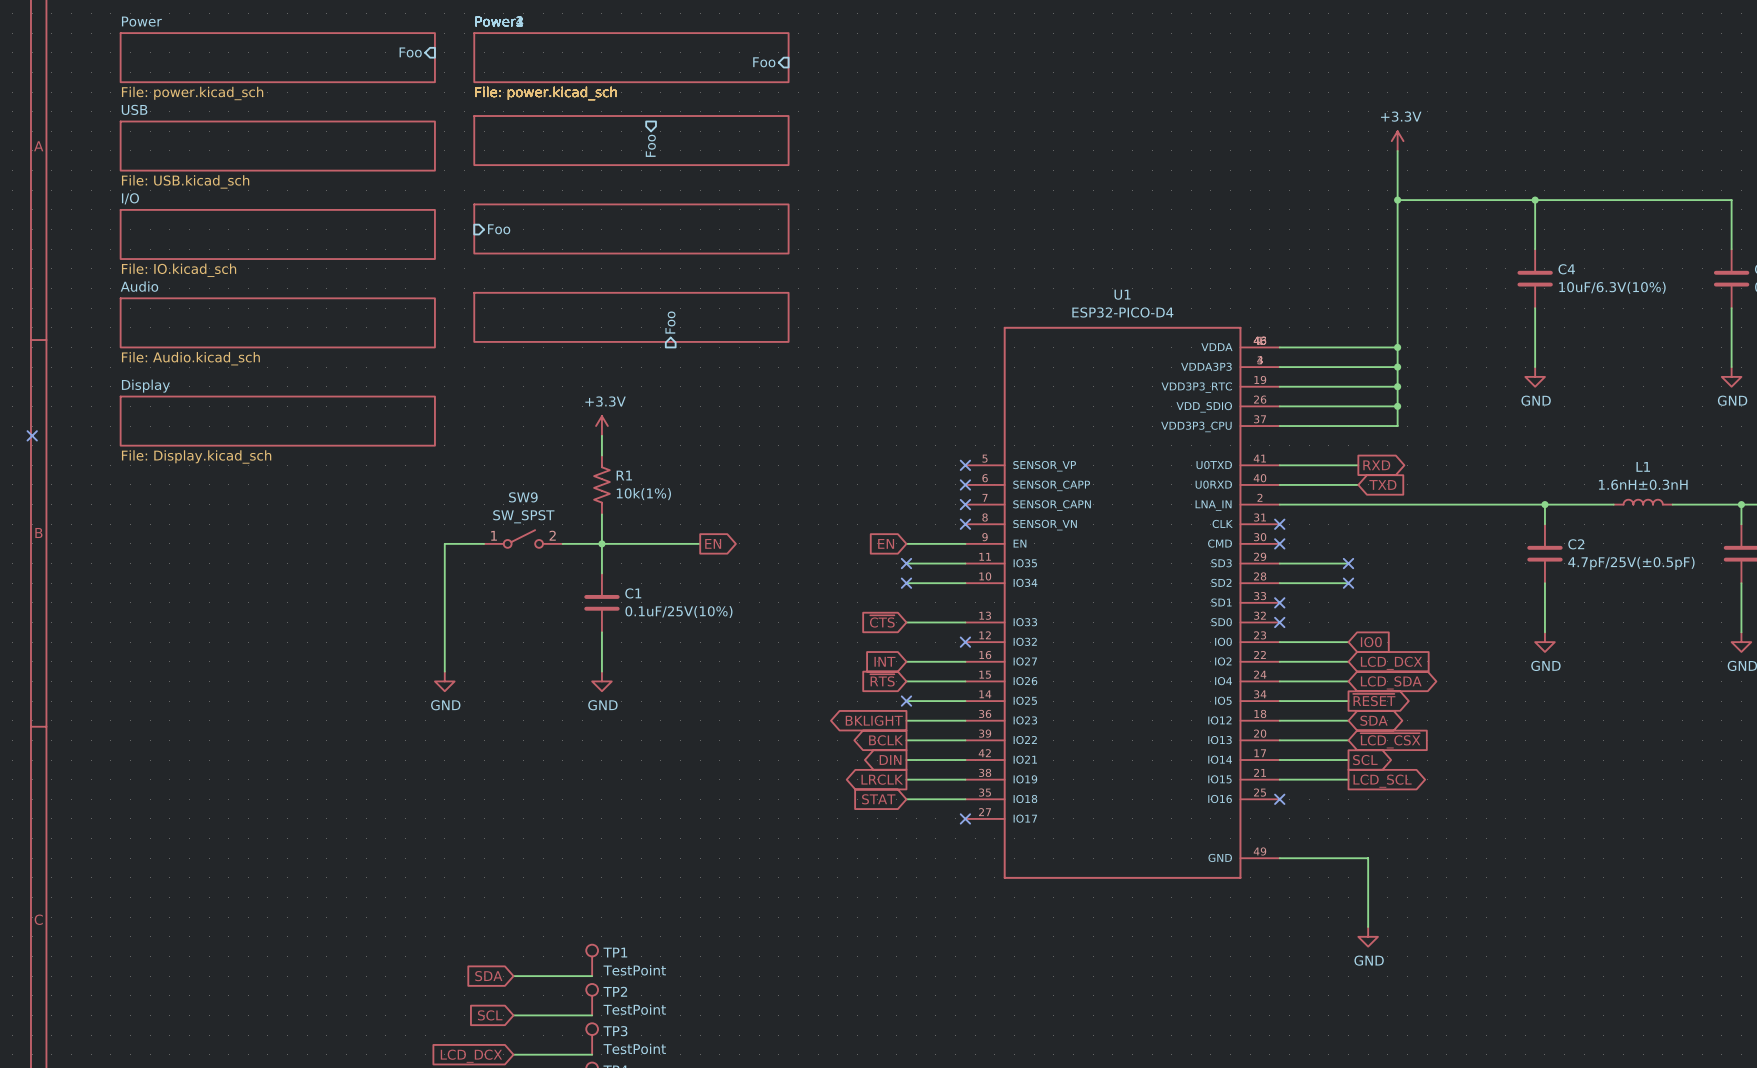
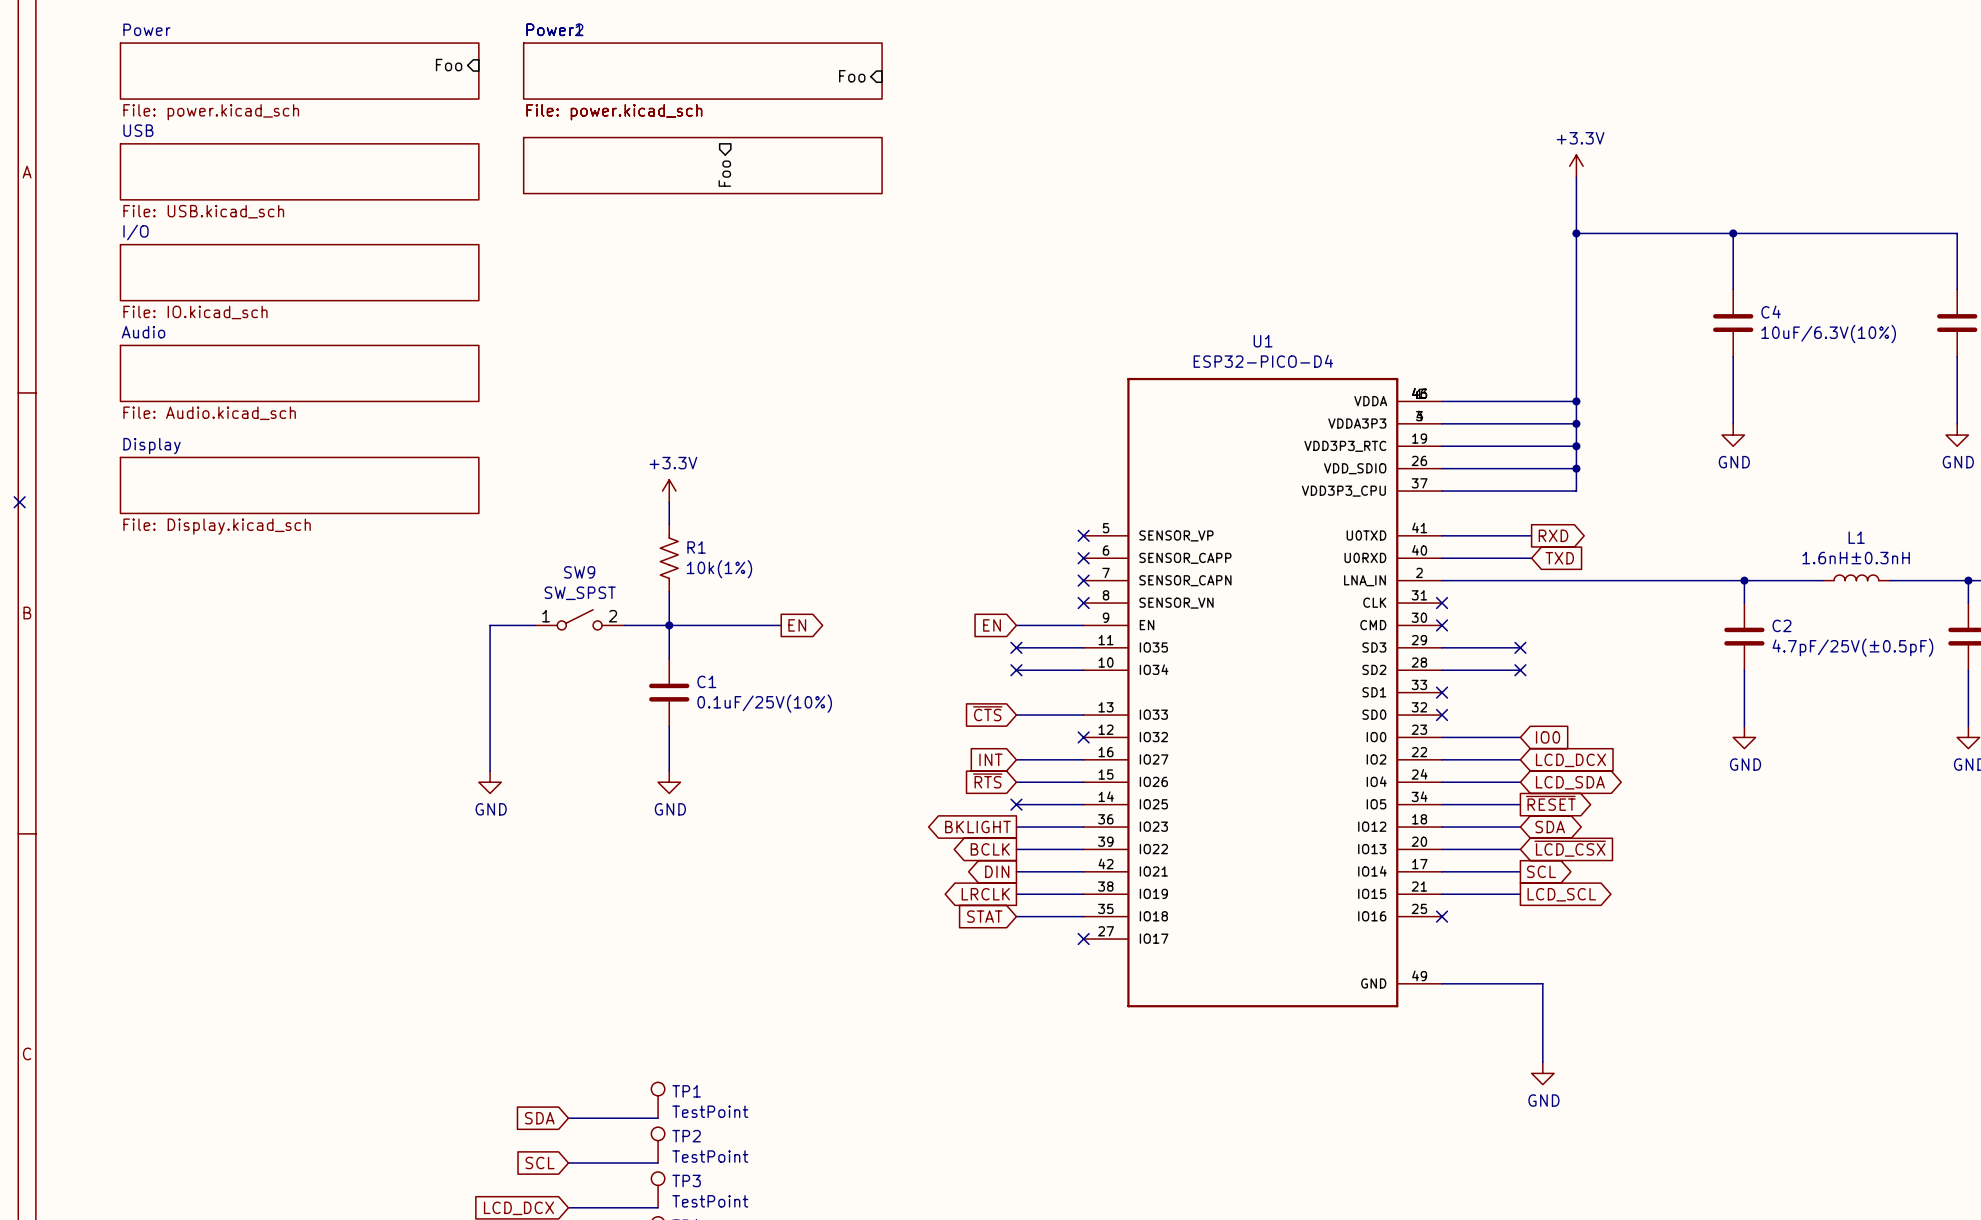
sheet: File: power.kicad_sch (631, 228) -> none
sheet pin: Foo (499, 229) -> none
sheet: File: power.kicad_sch (631, 317) -> none
sheet pin: Foo (670, 322) -> none

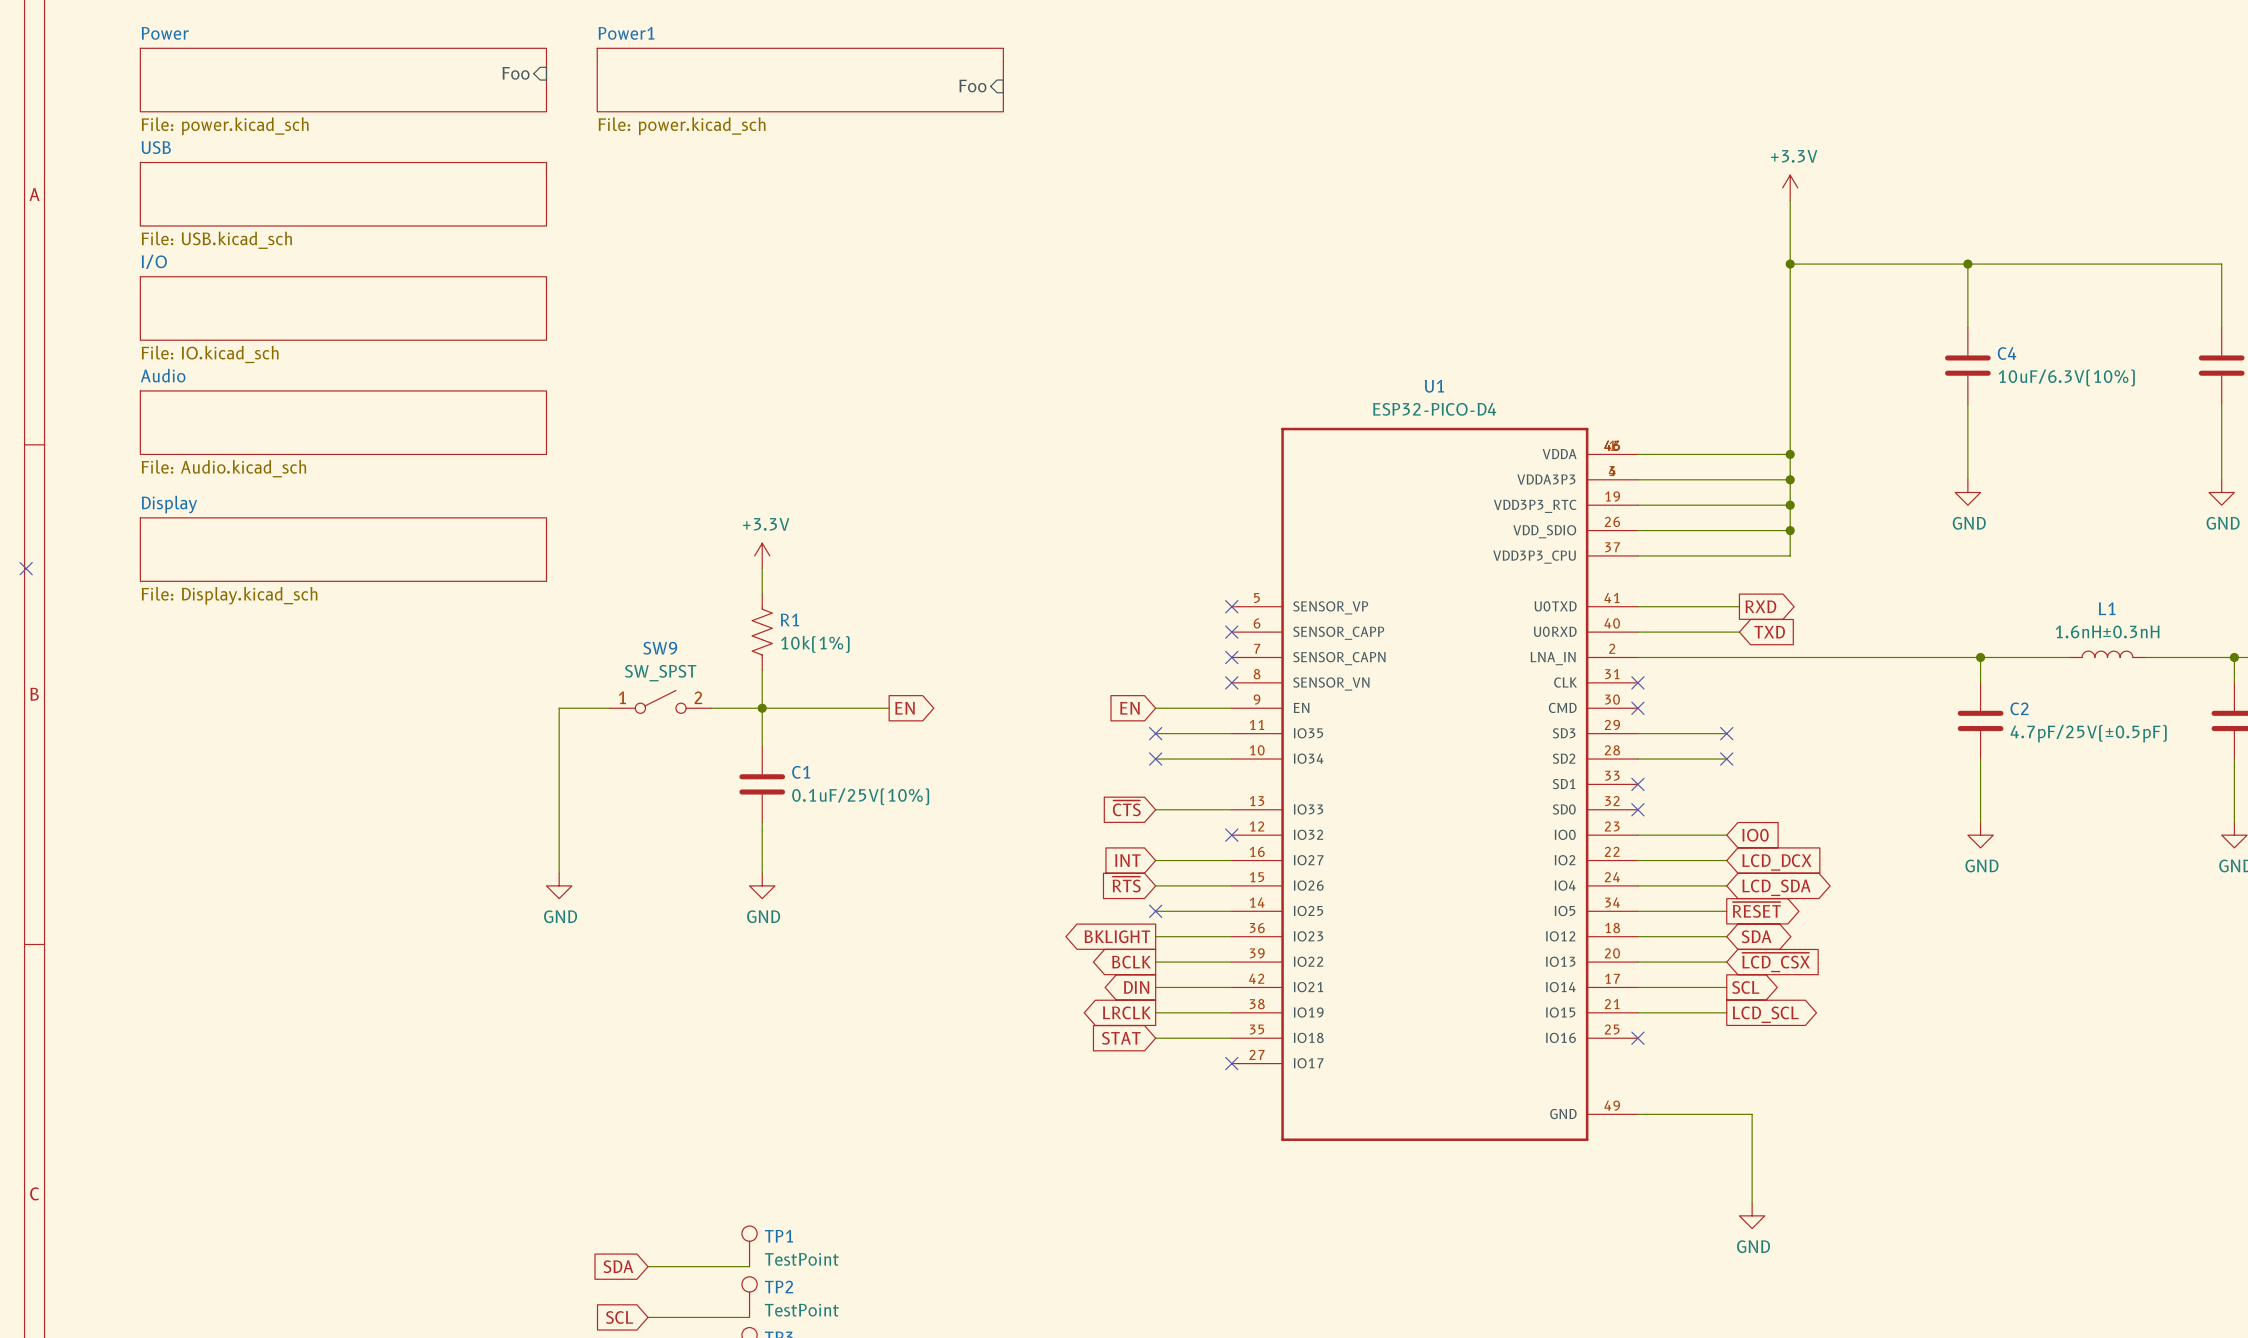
sheet: File: power.kicad_sch (702, 165) -> none
sheet pin: Foo (724, 173) -> none

